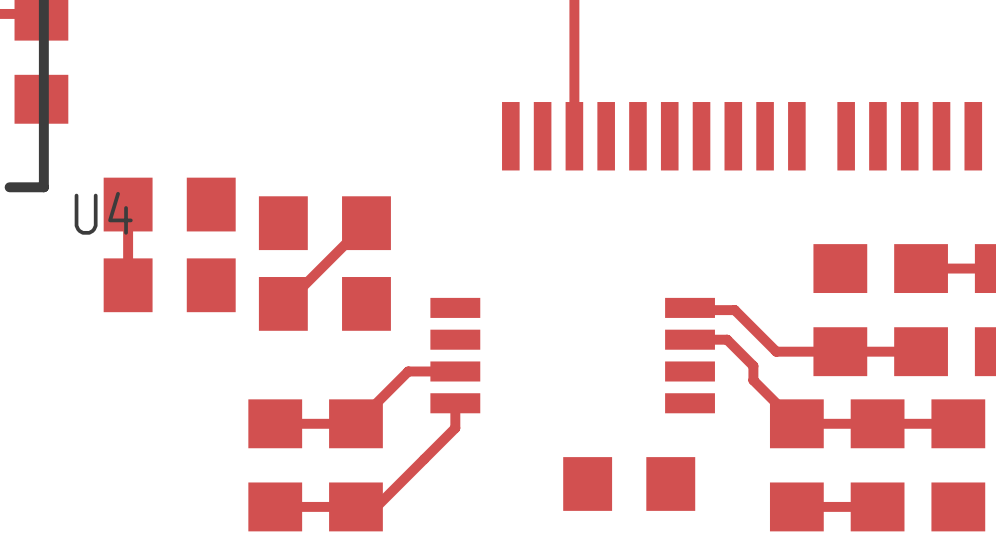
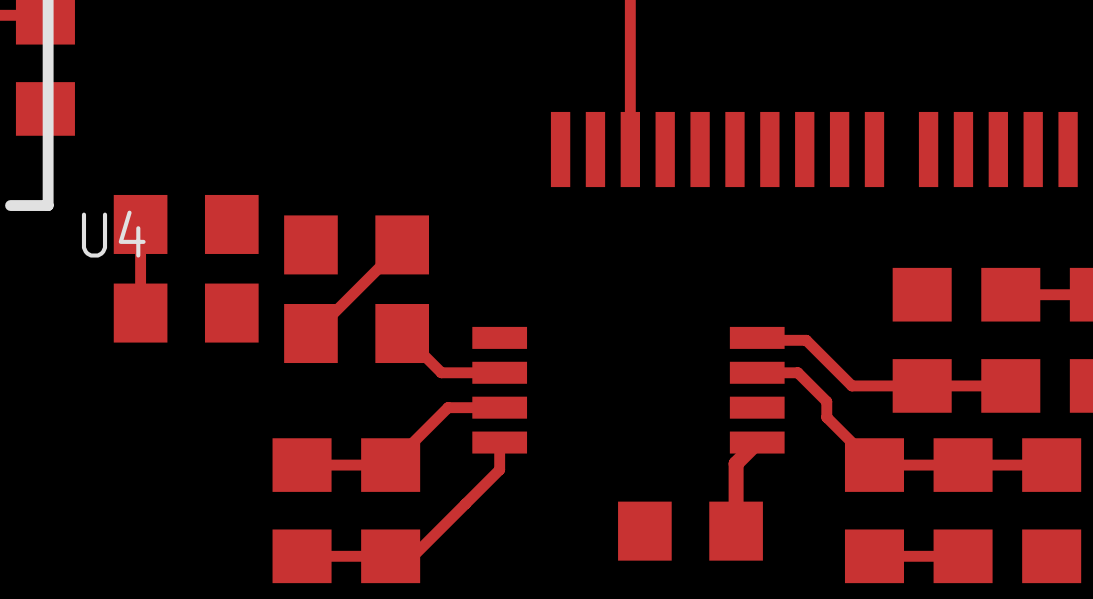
top track: none -> (402, 333) (441, 372) (499, 372)
top track: none -> (757, 442) (736, 463) (736, 531)

